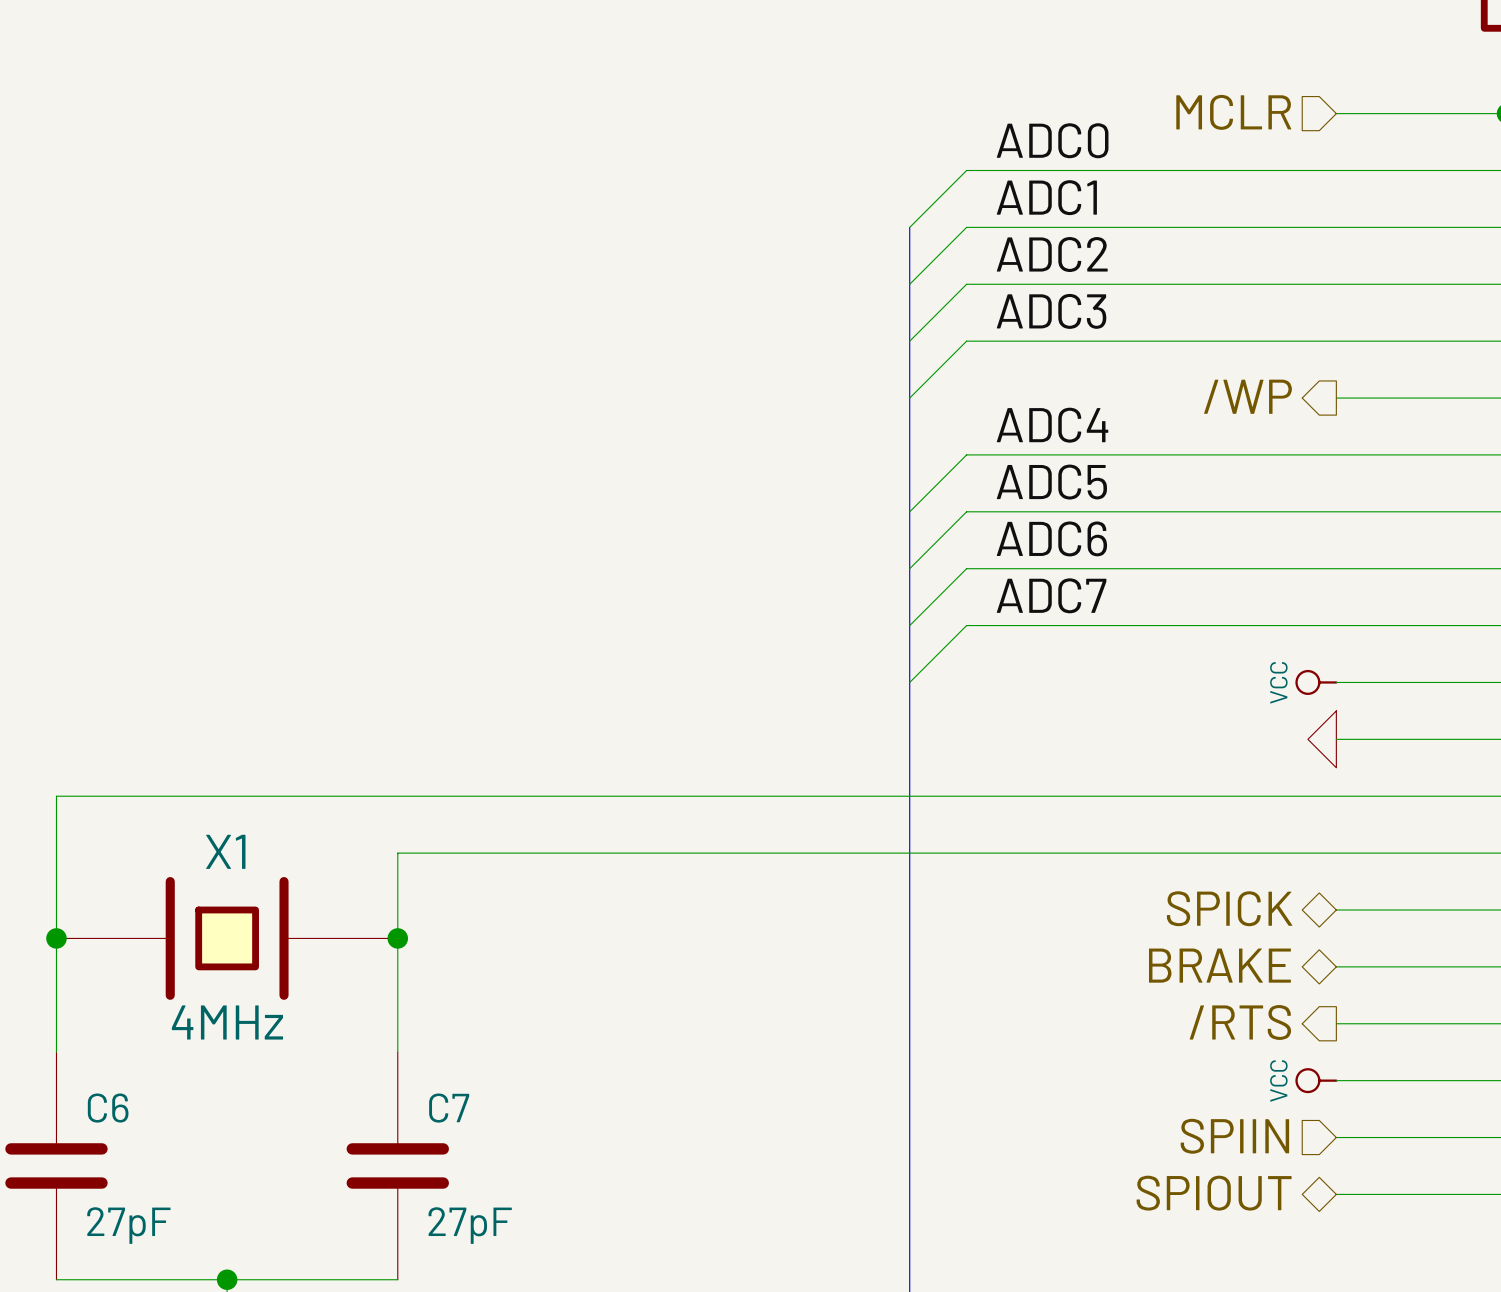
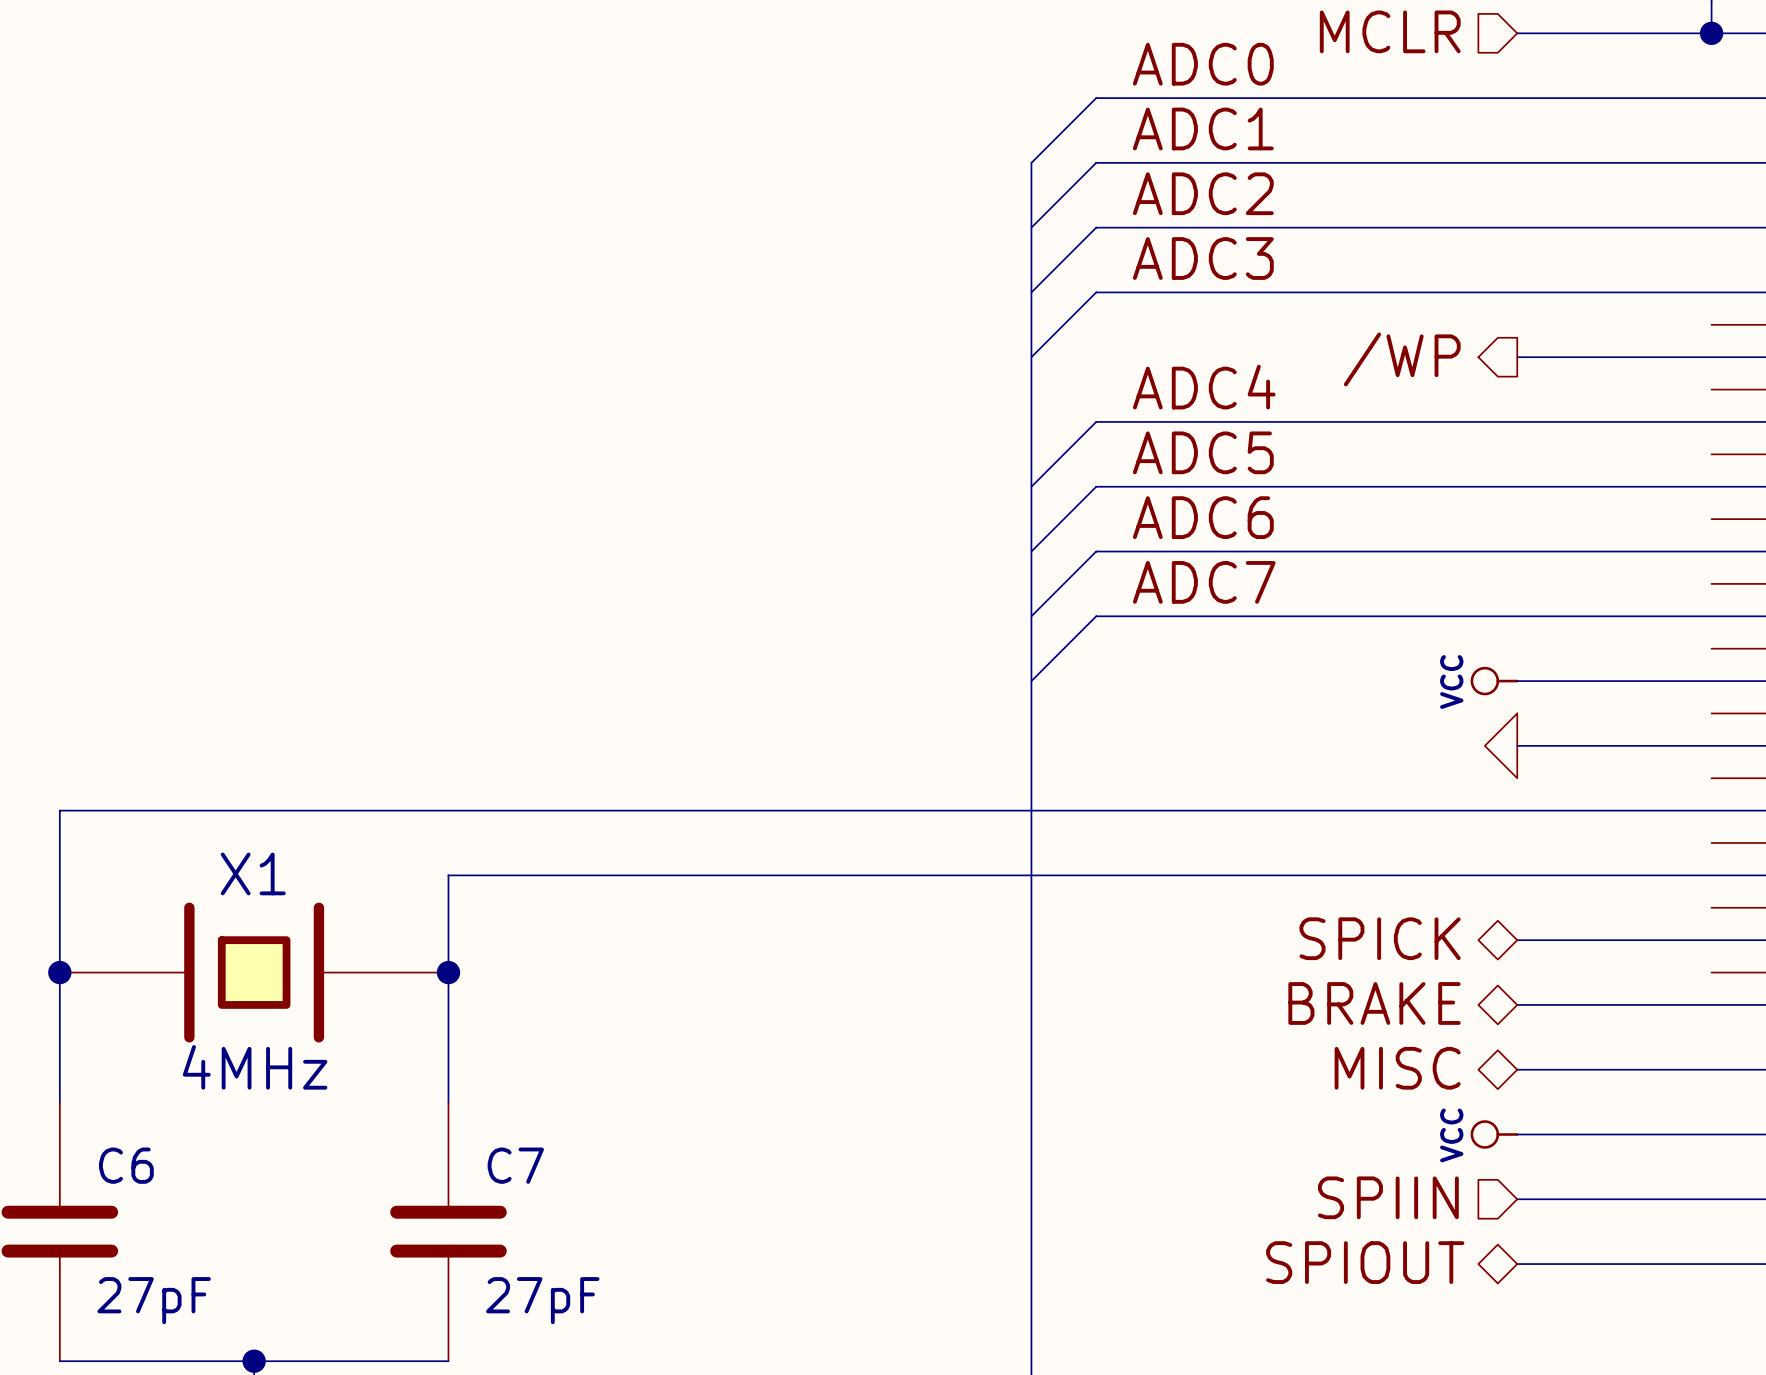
hierarchical label shape: output (1240, 1022) -> bidirectional (1397, 1068)
hierarchical label: /RTS (1240, 1022) -> MISC (1397, 1068)

